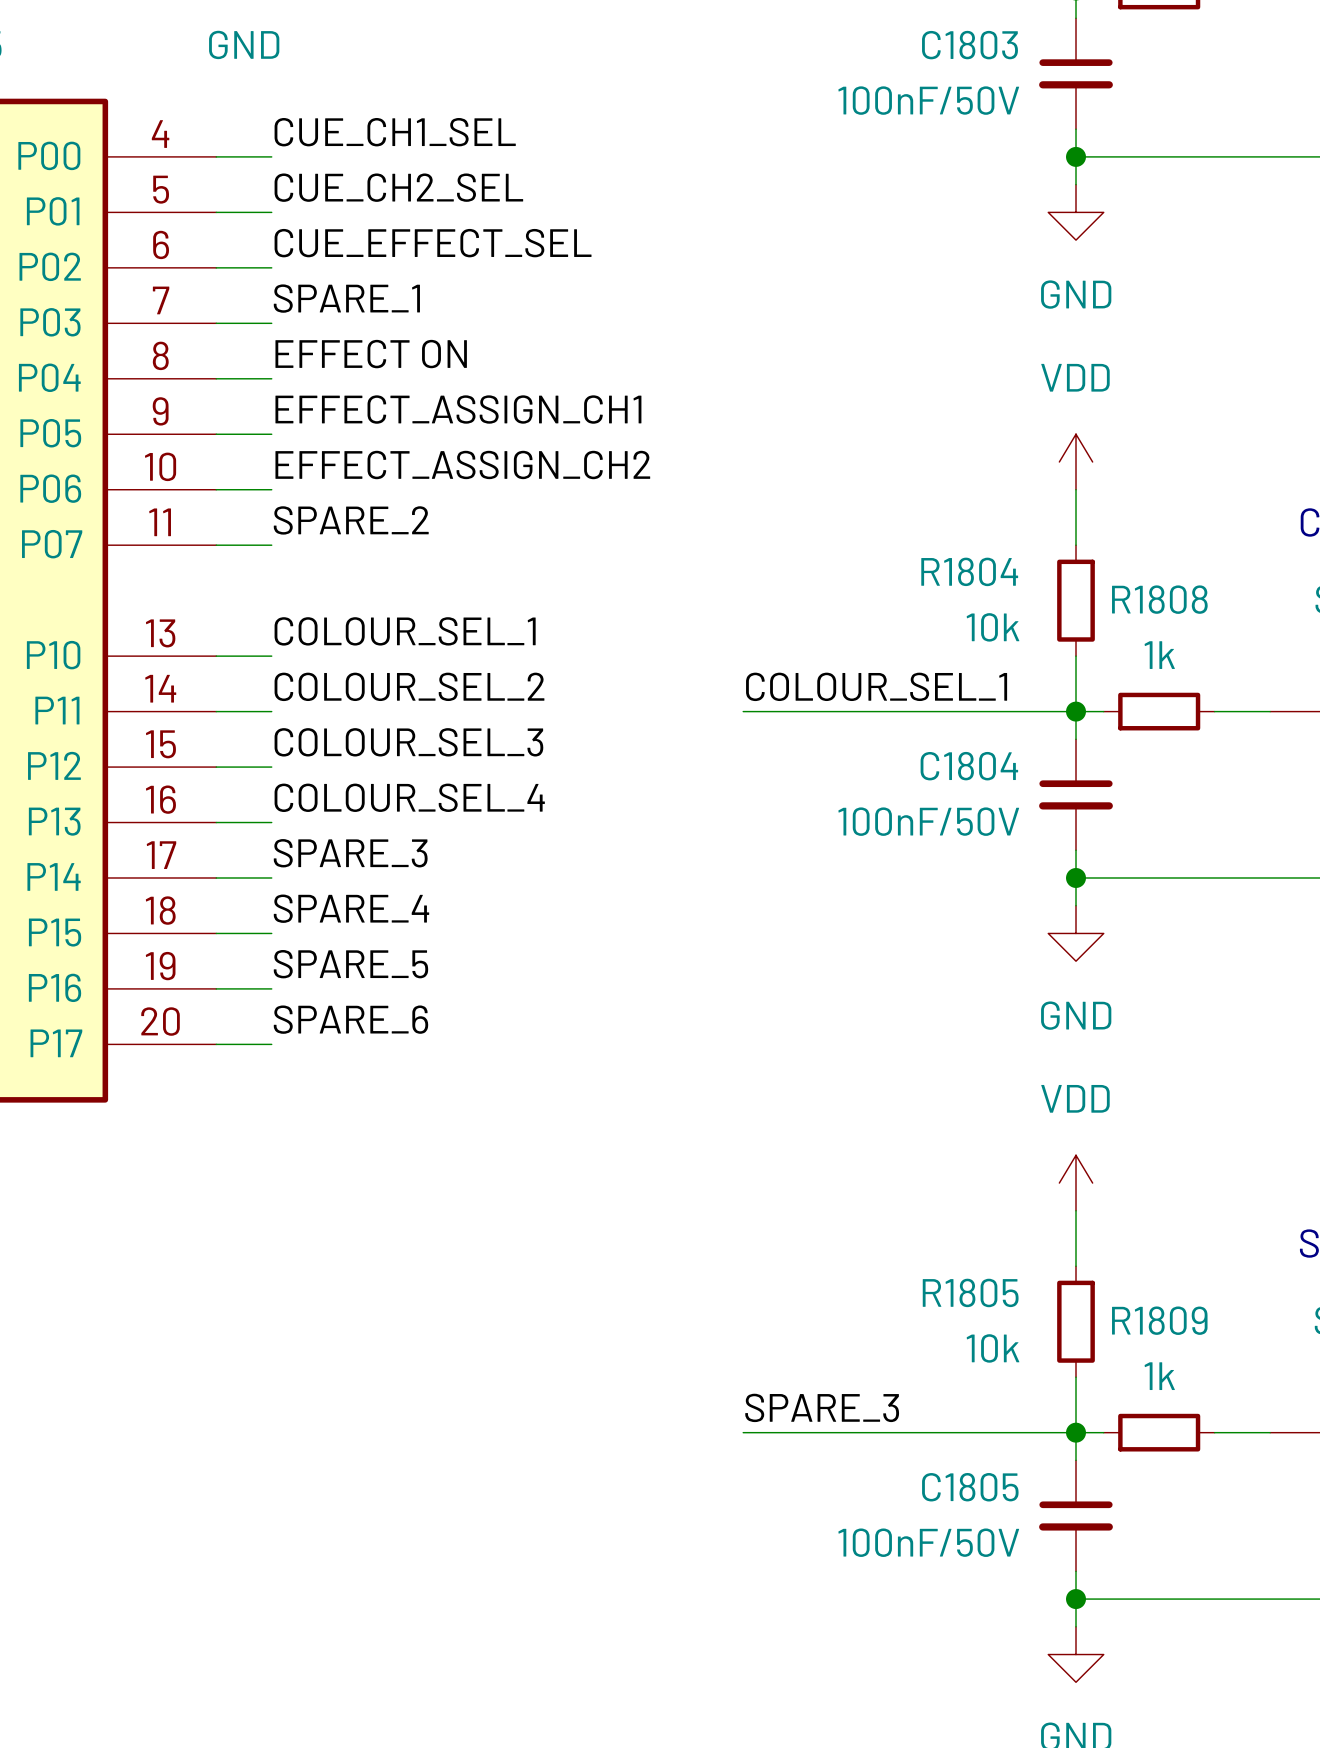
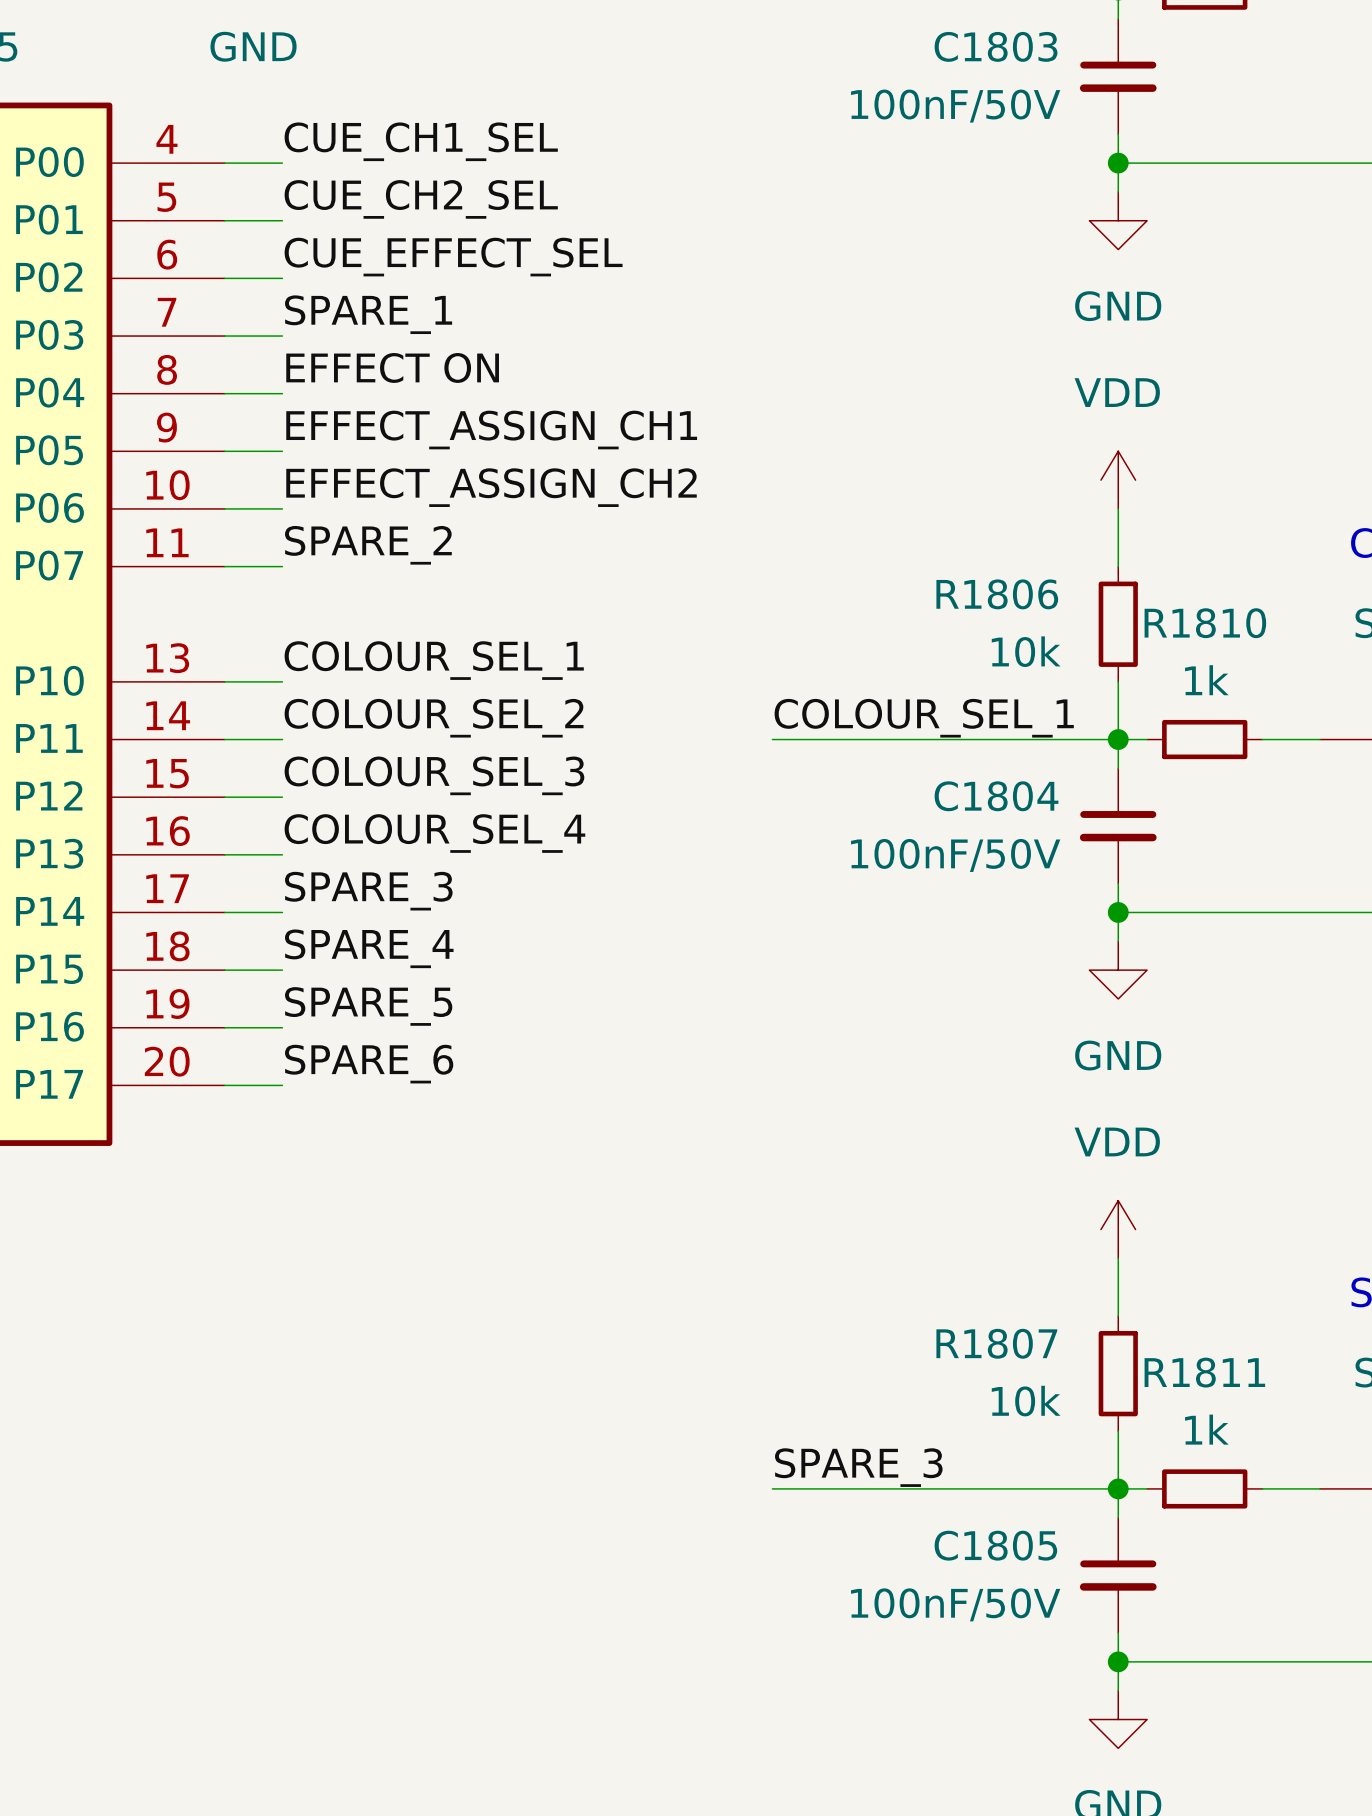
R1804 name: R1804 (969, 571) -> R1806 (997, 594)
R1808 name: R1808 (1159, 599) -> R1810 (1205, 623)
R1805 name: R1805 (970, 1292) -> R1807 (996, 1343)
R1809 name: R1809 (1159, 1320) -> R1811 (1204, 1372)

